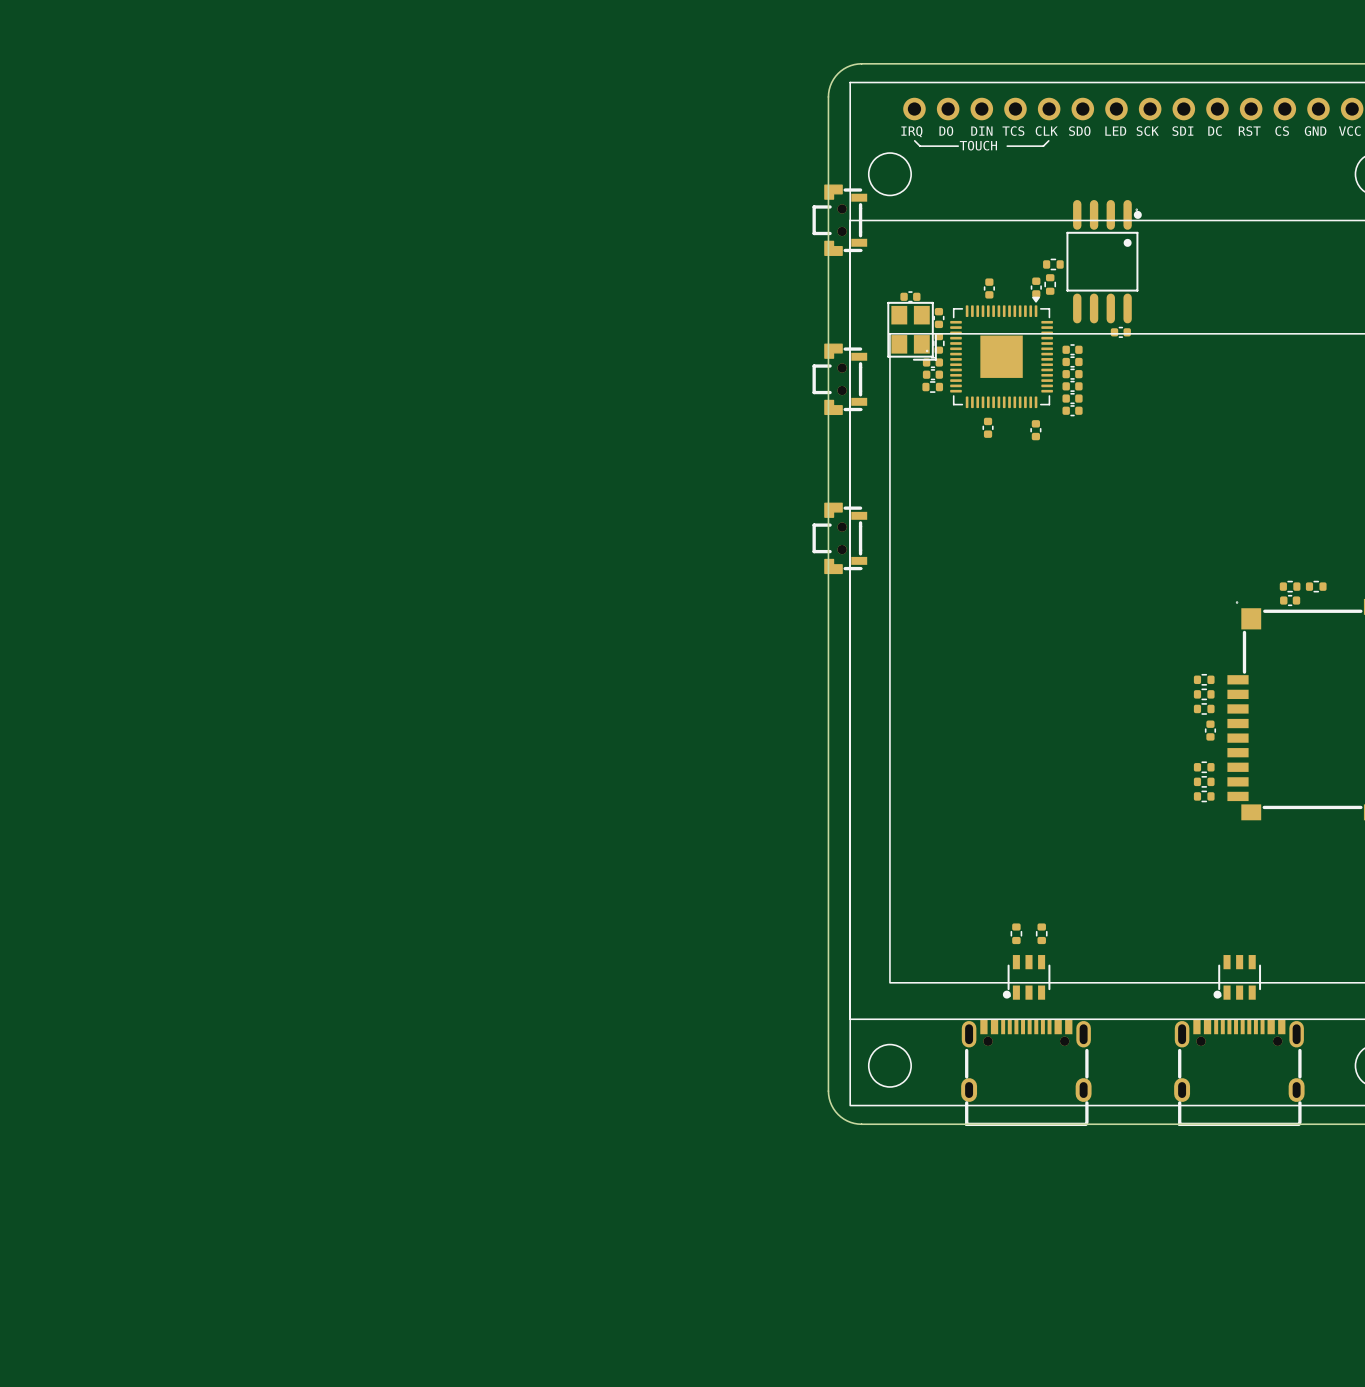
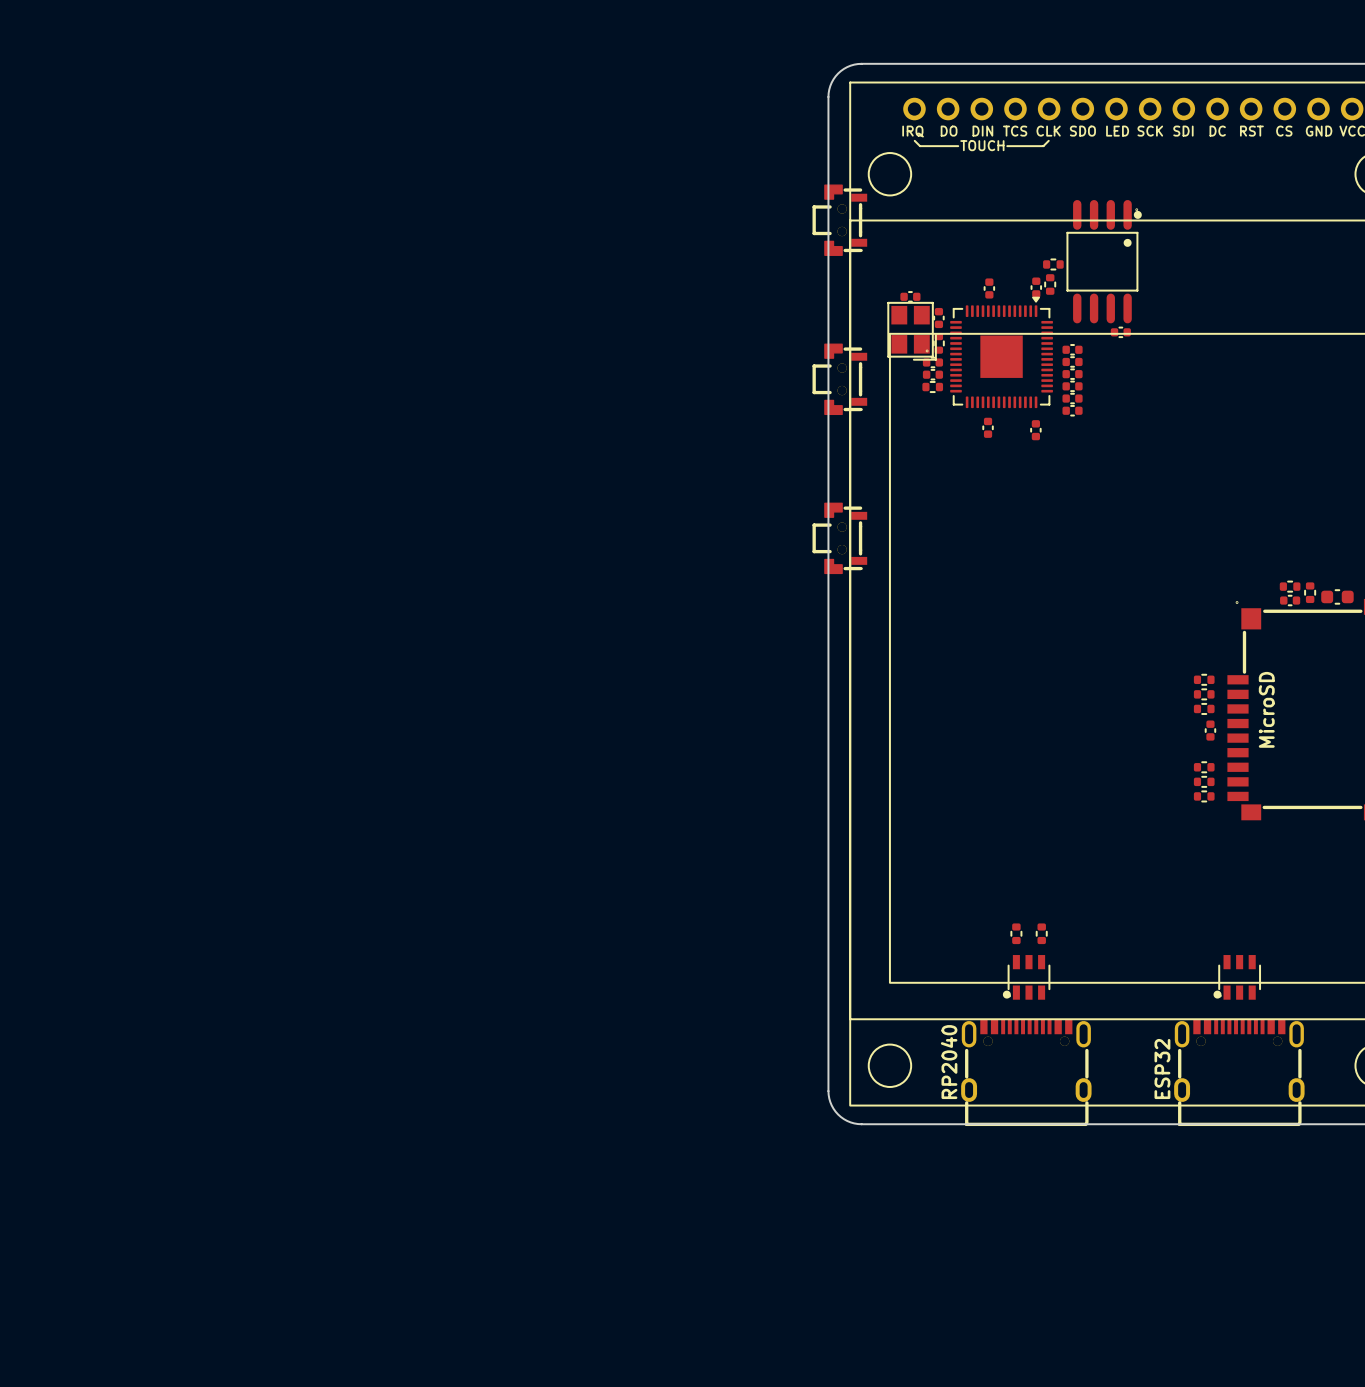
part rotation: 0° (1316, 586) -> 90° clockwise (1310, 592)
part: none -> (1337, 596)
text: none -> MicroSD (1266, 709)
text: none -> RP2040 (949, 1062)
text: none -> ESP32 (1162, 1069)

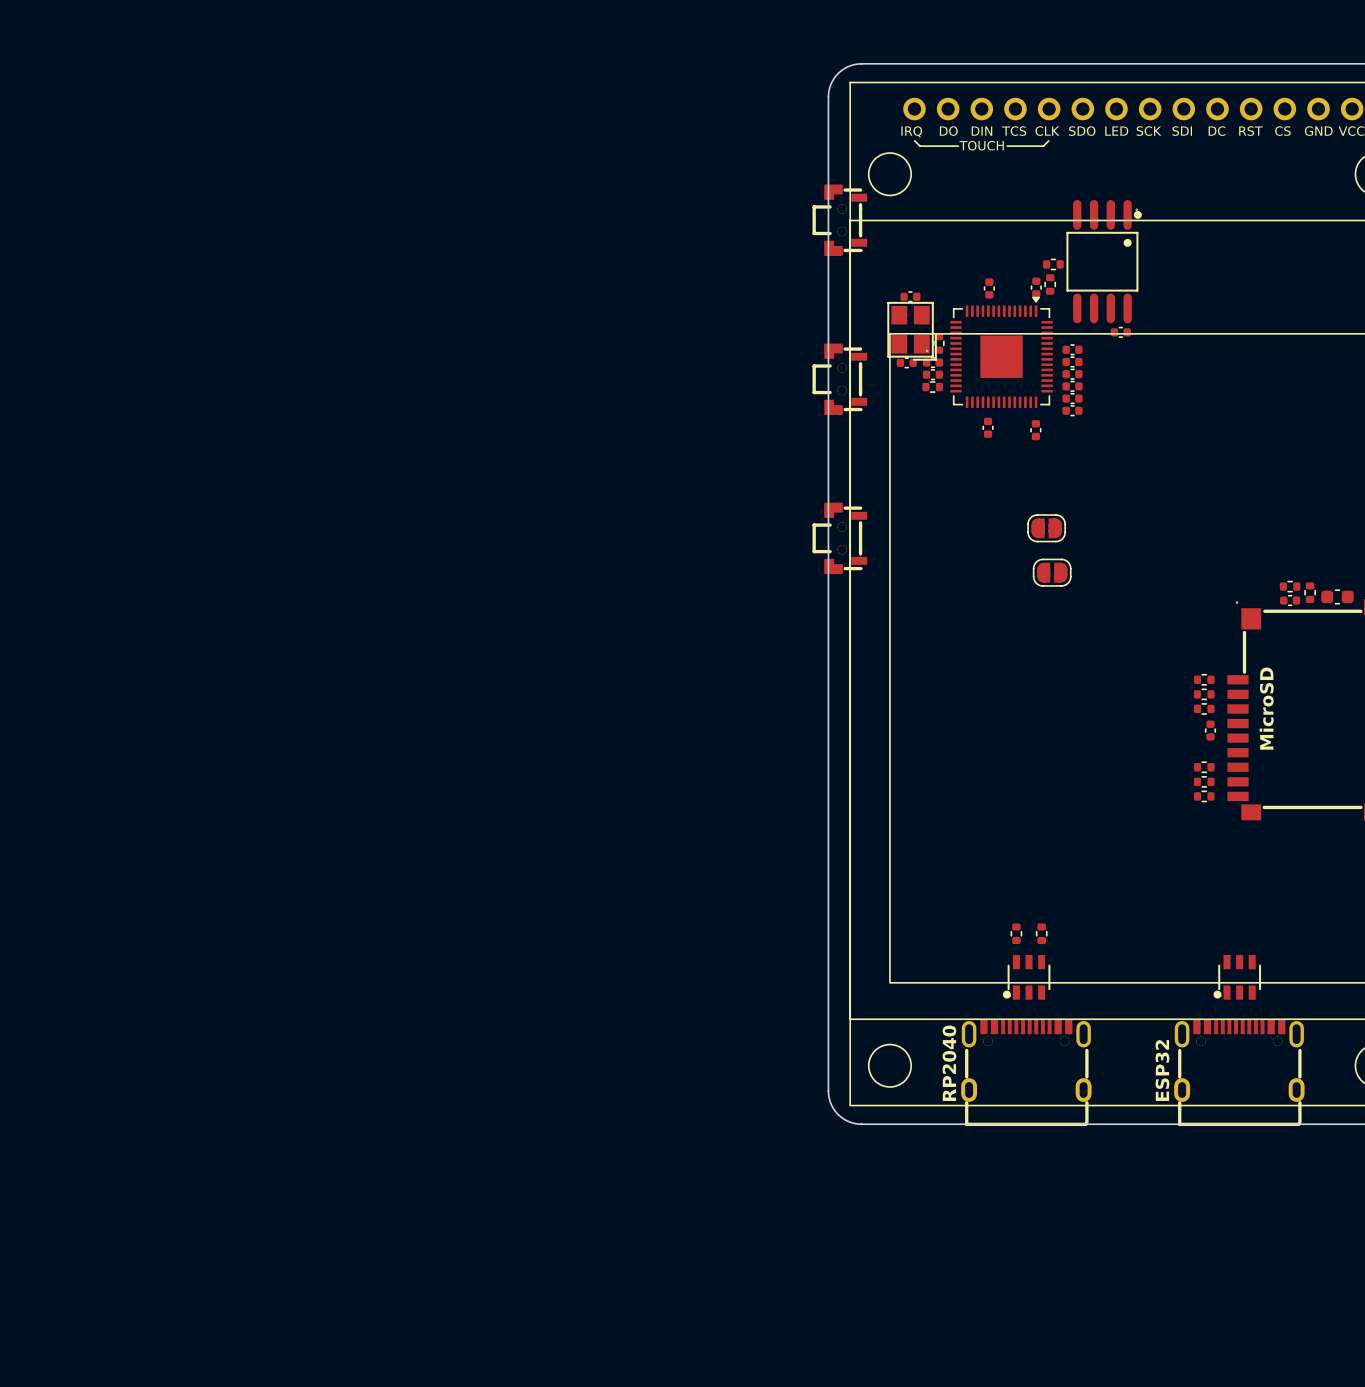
part rotation: 0° (938, 318) -> 90° clockwise (906, 362)
part position: (938, 318) -> (906, 362)
part: none -> (1046, 528)
part: none -> (1052, 572)

